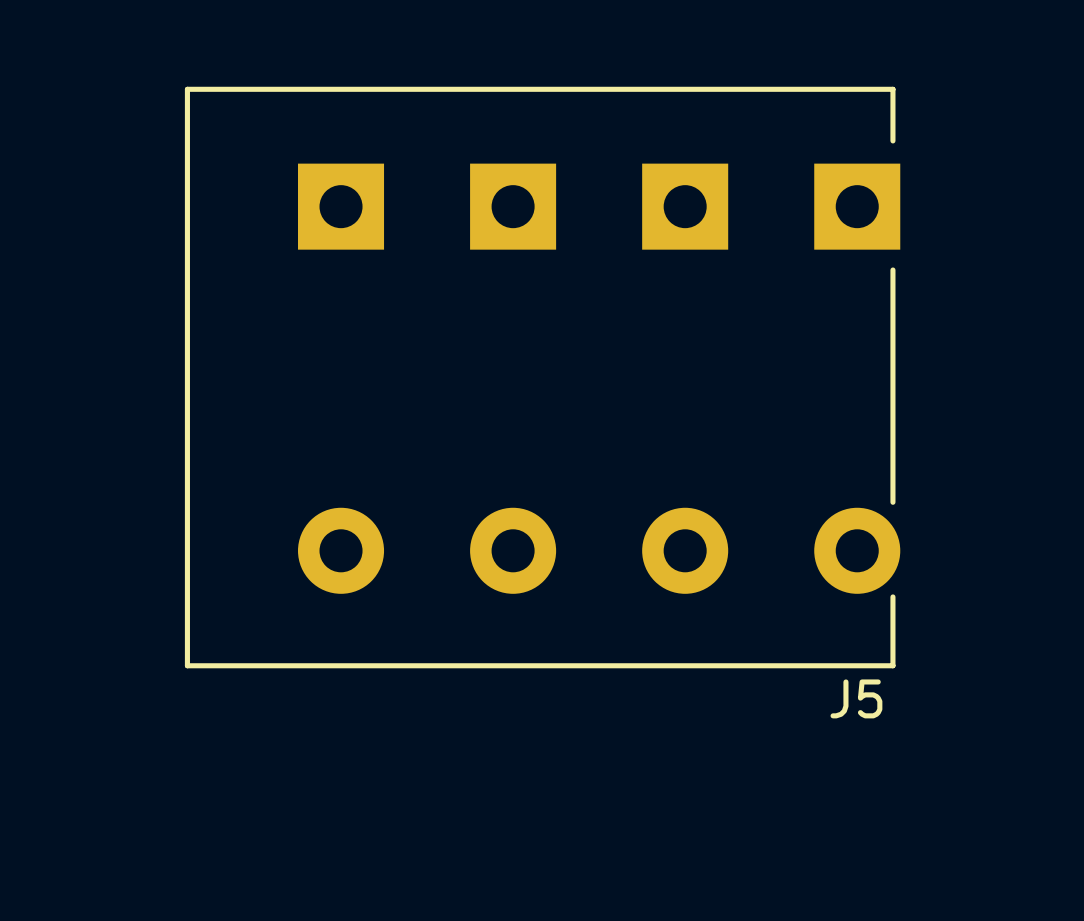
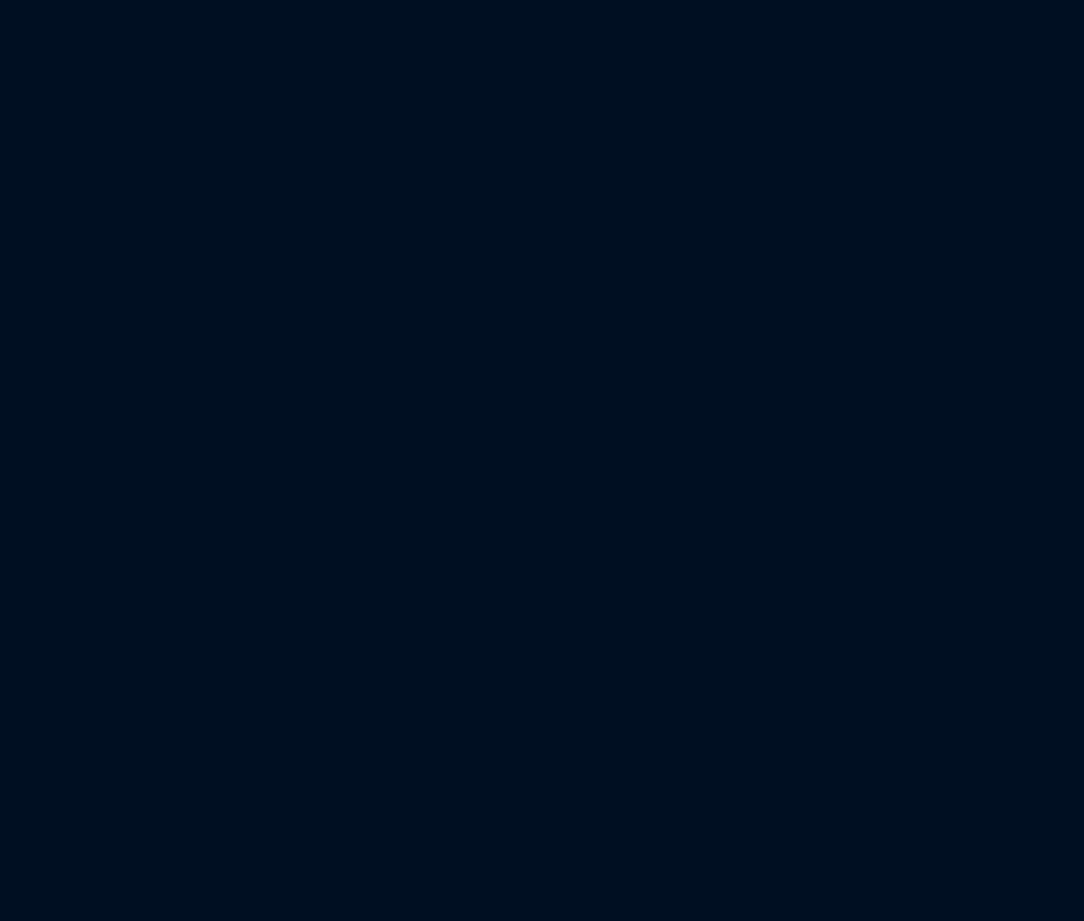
J5: (542, 377) -> none

